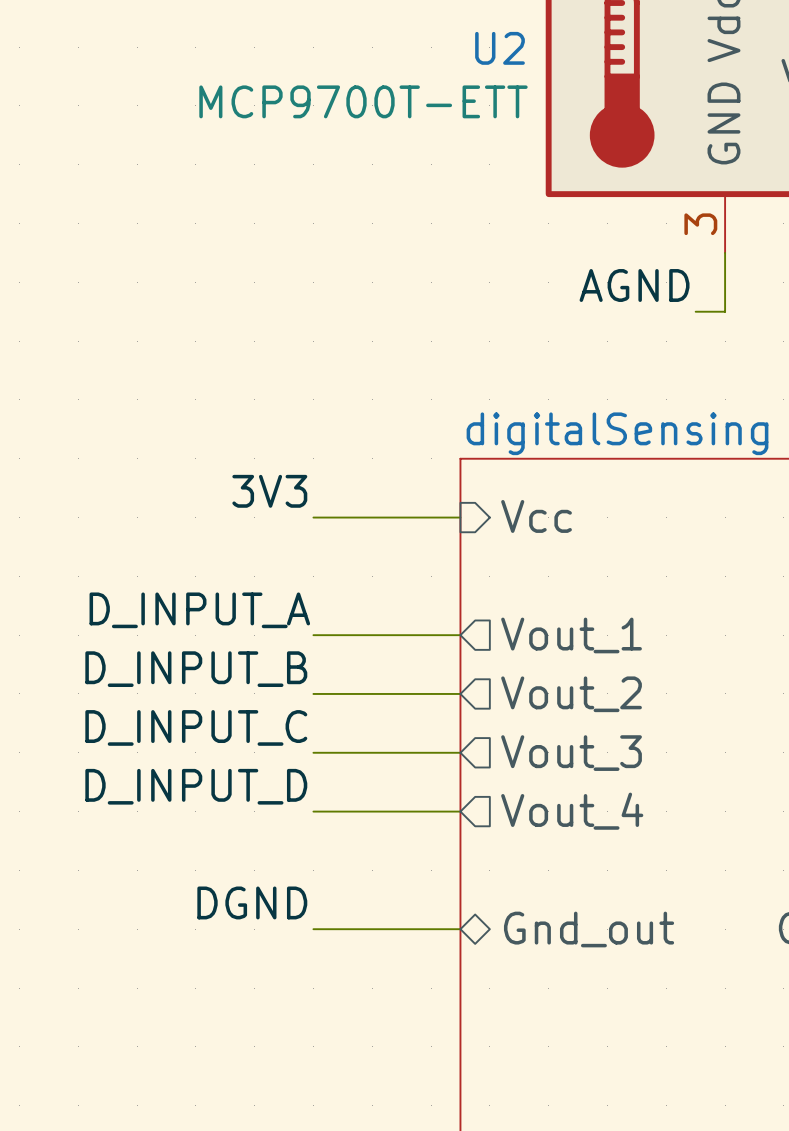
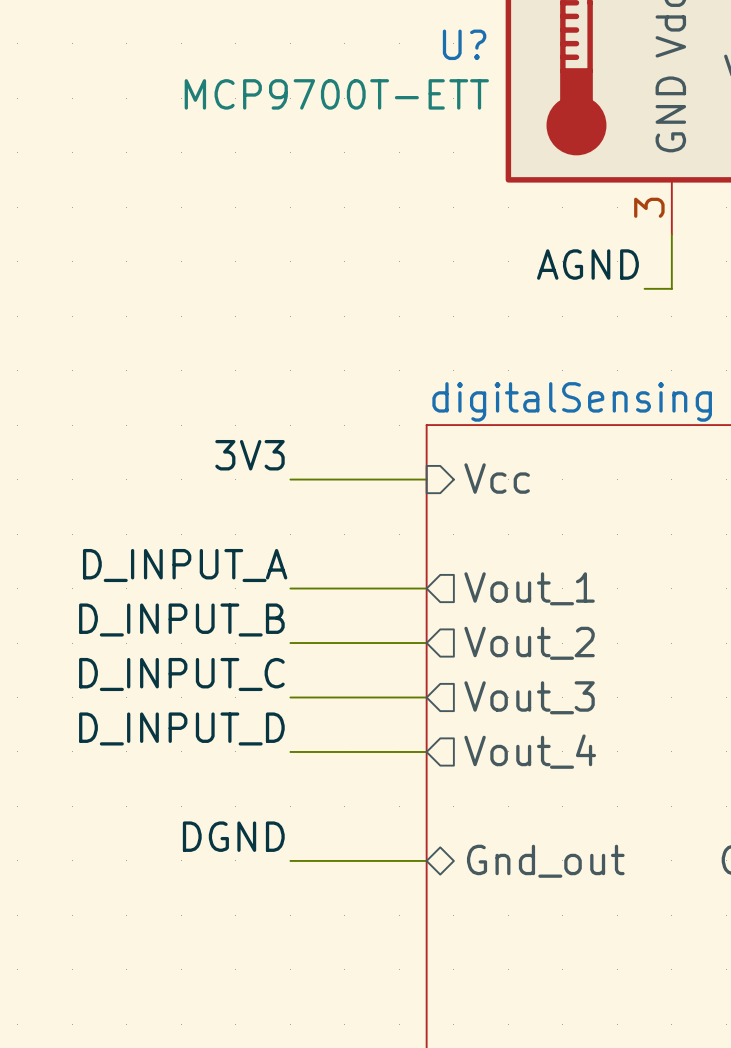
U2 name: U2 (500, 48) -> U? (464, 44)

